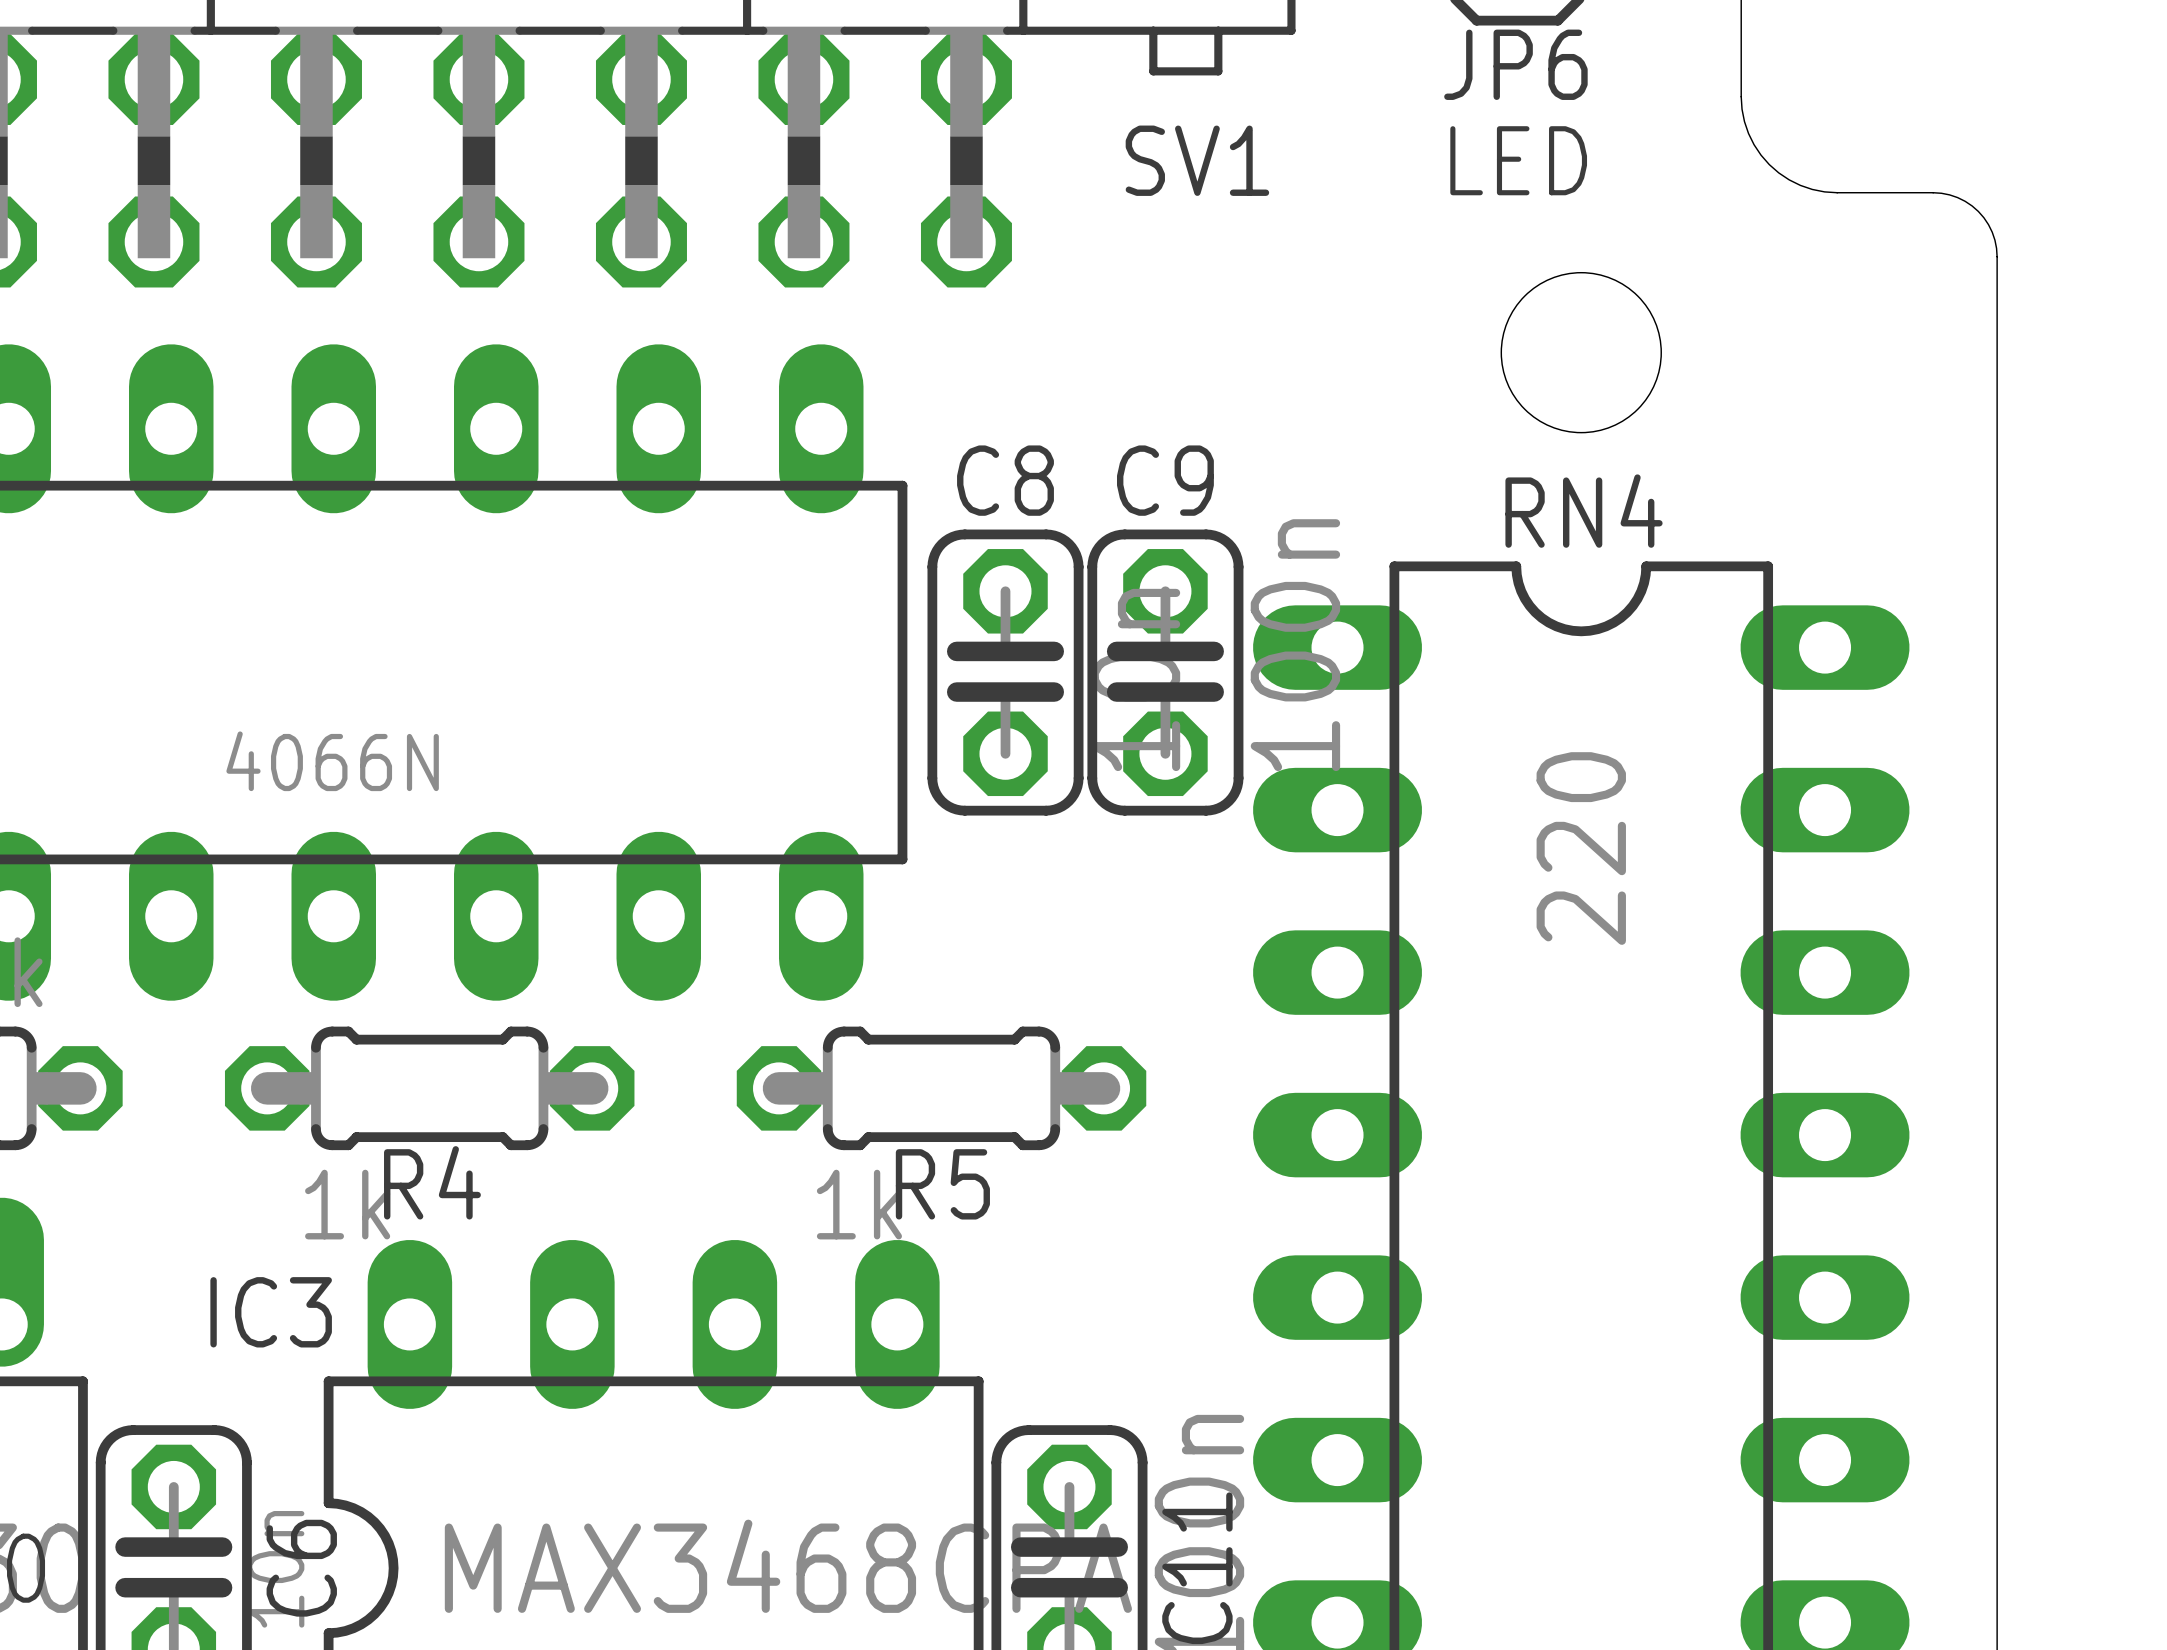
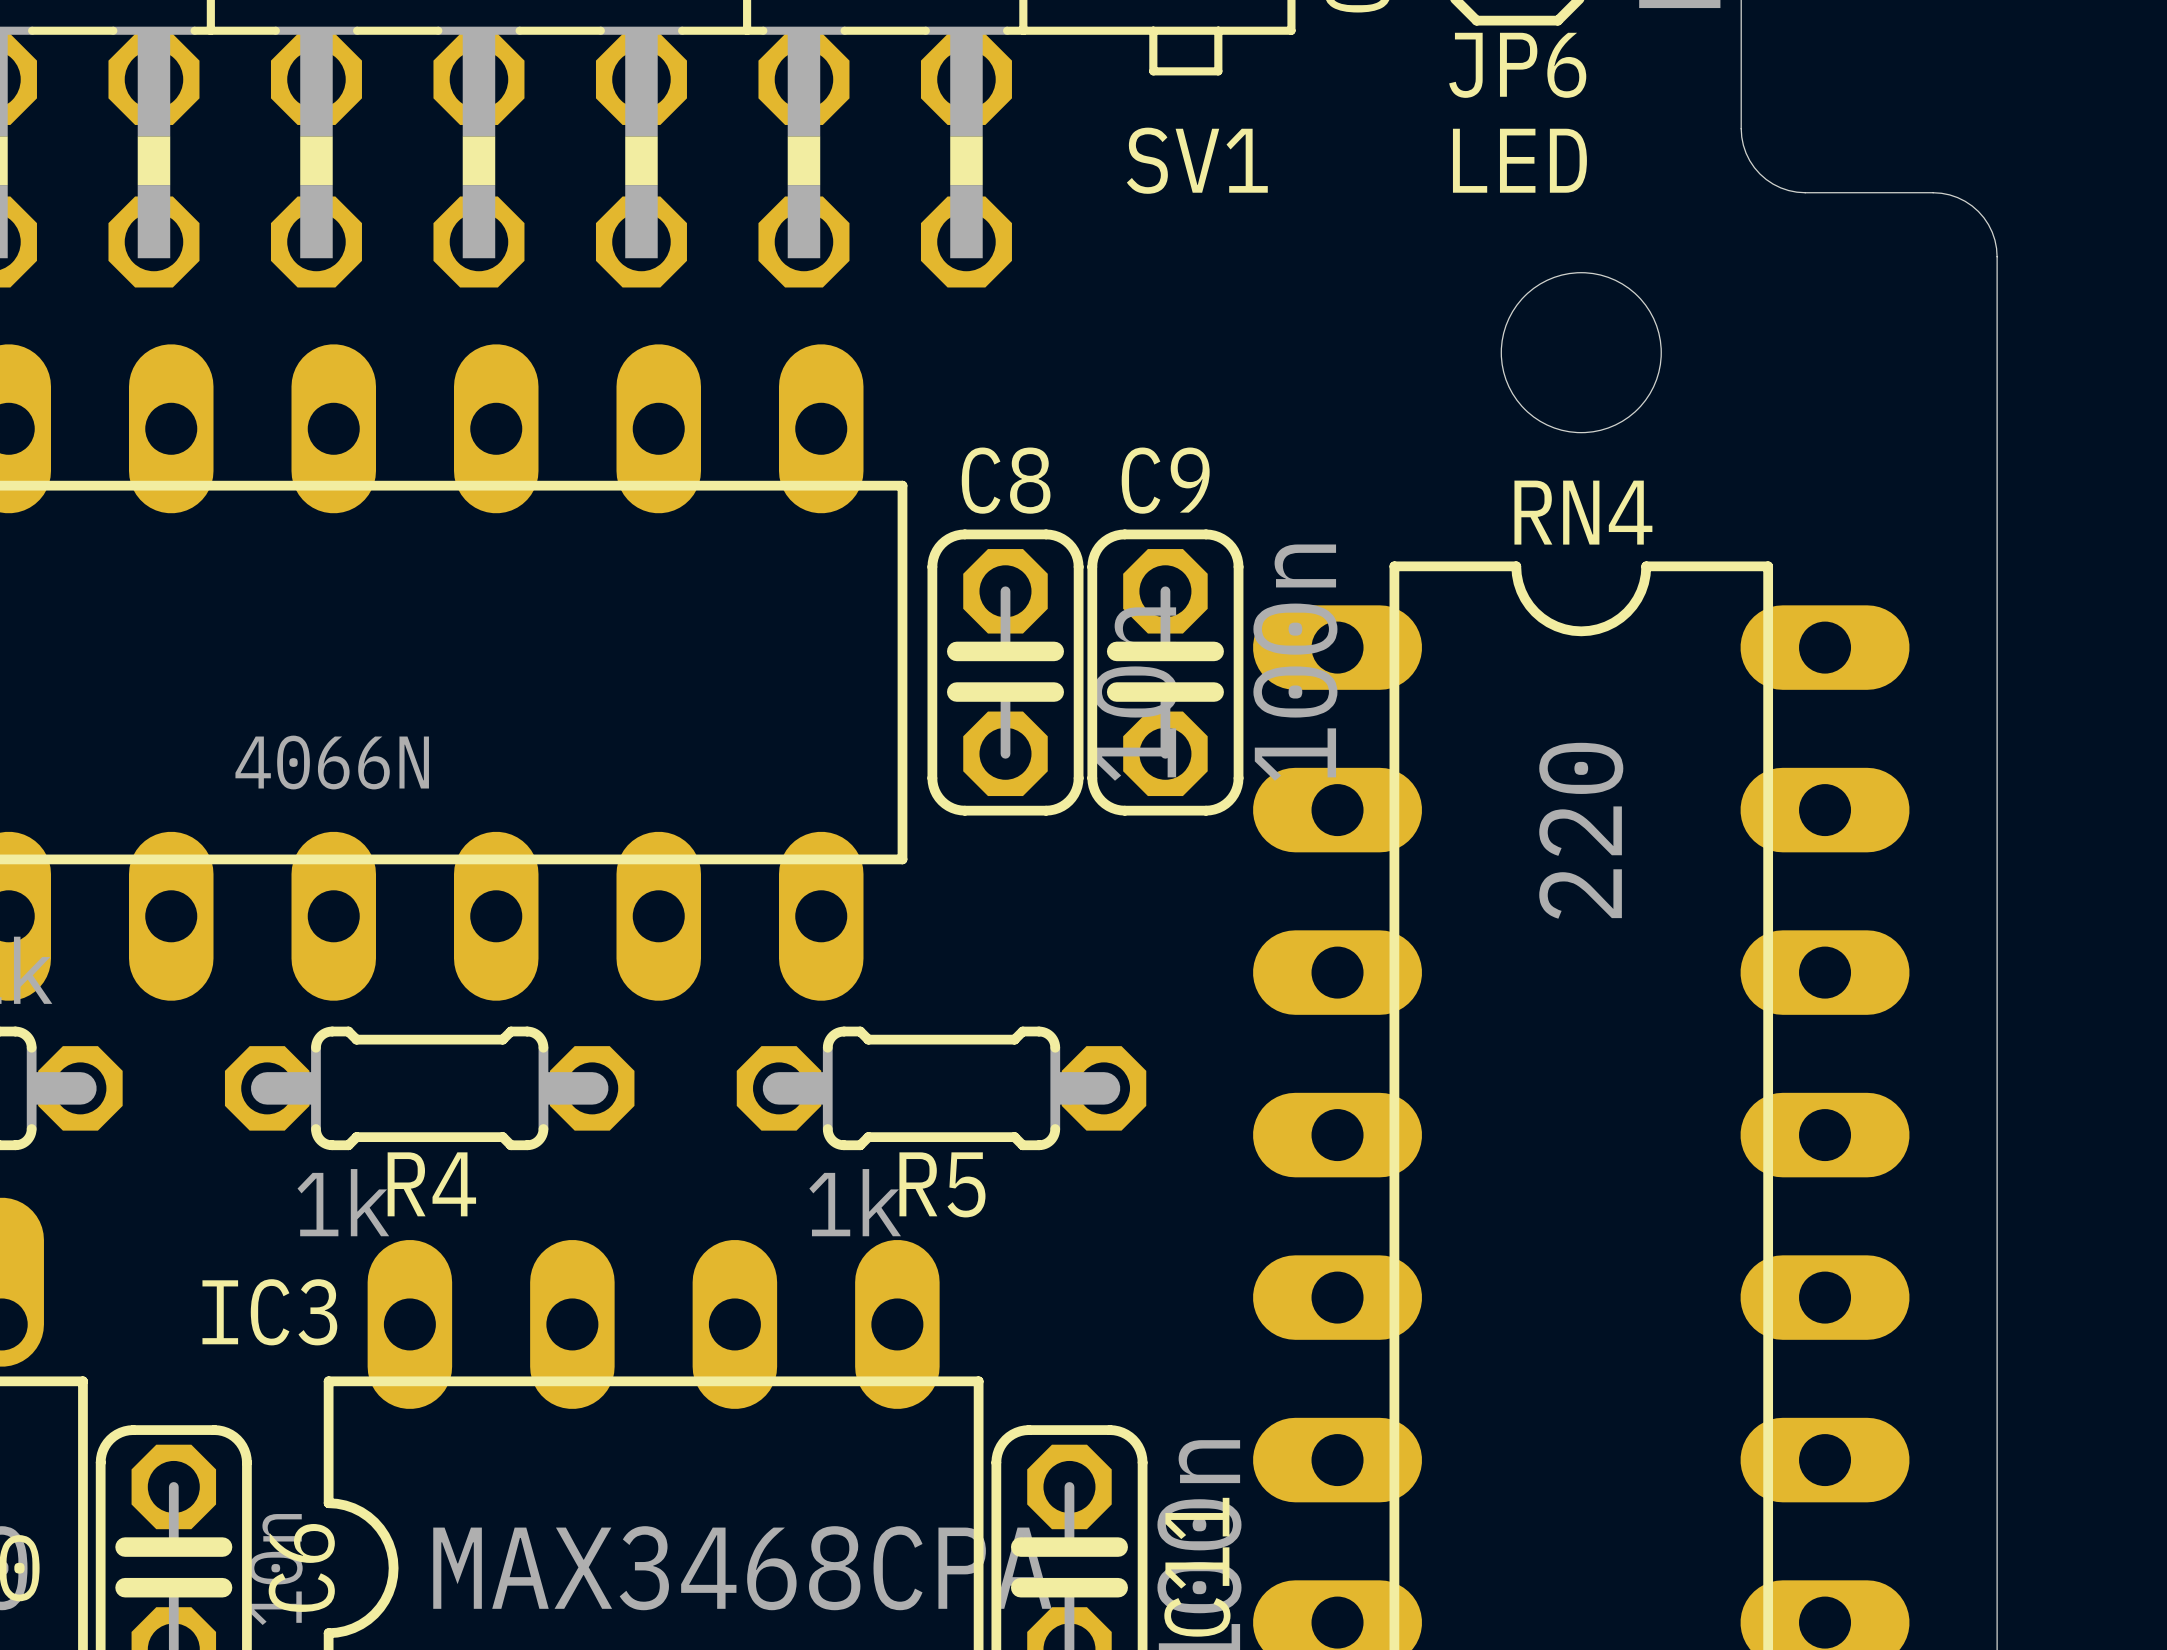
board edge: (1741, 96) (1742, 109) (1748, 133) (1754, 144) (1769, 164) (1789, 179) (1800, 185) (1824, 191) (1837, 192) -> (1741, 96) (1743, 145) (1749, 160) (1759, 173) (1773, 184) (1788, 190) (1837, 192)

